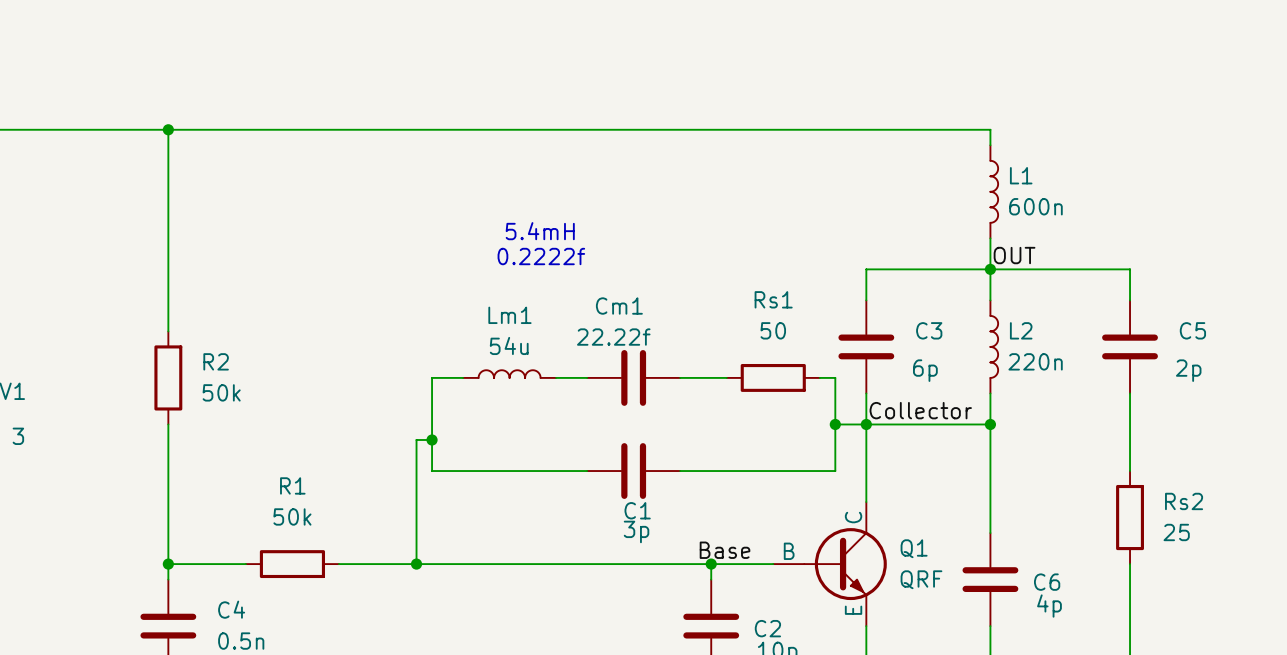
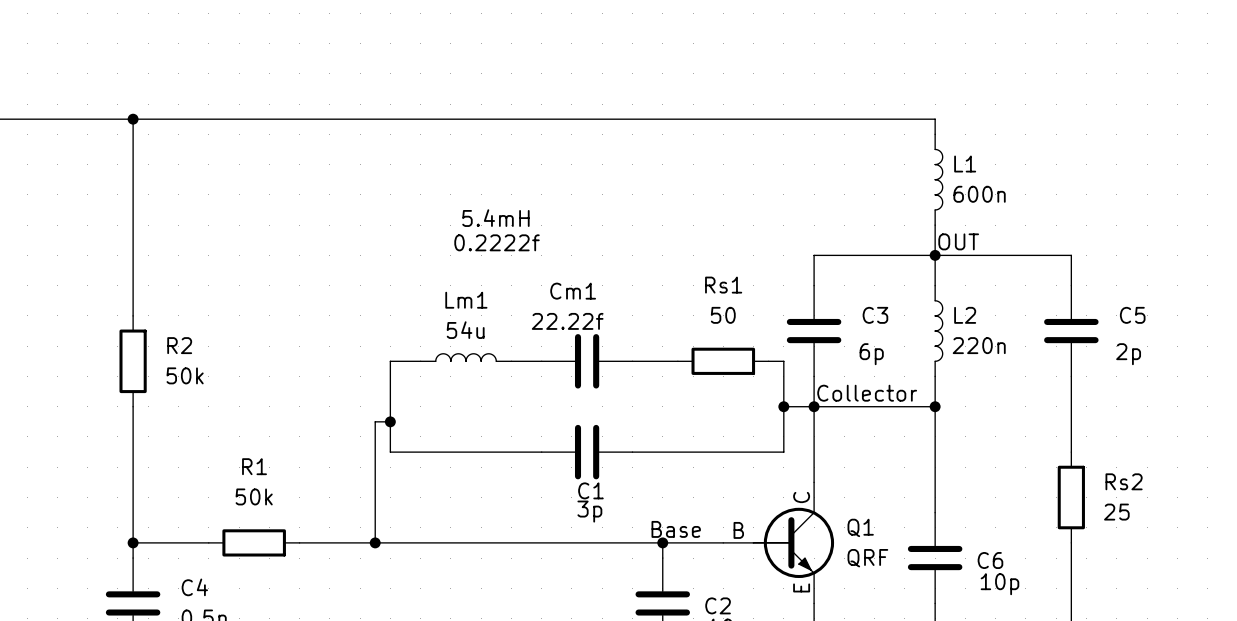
C6 value: 4p (1049, 606) -> 10p (999, 584)

